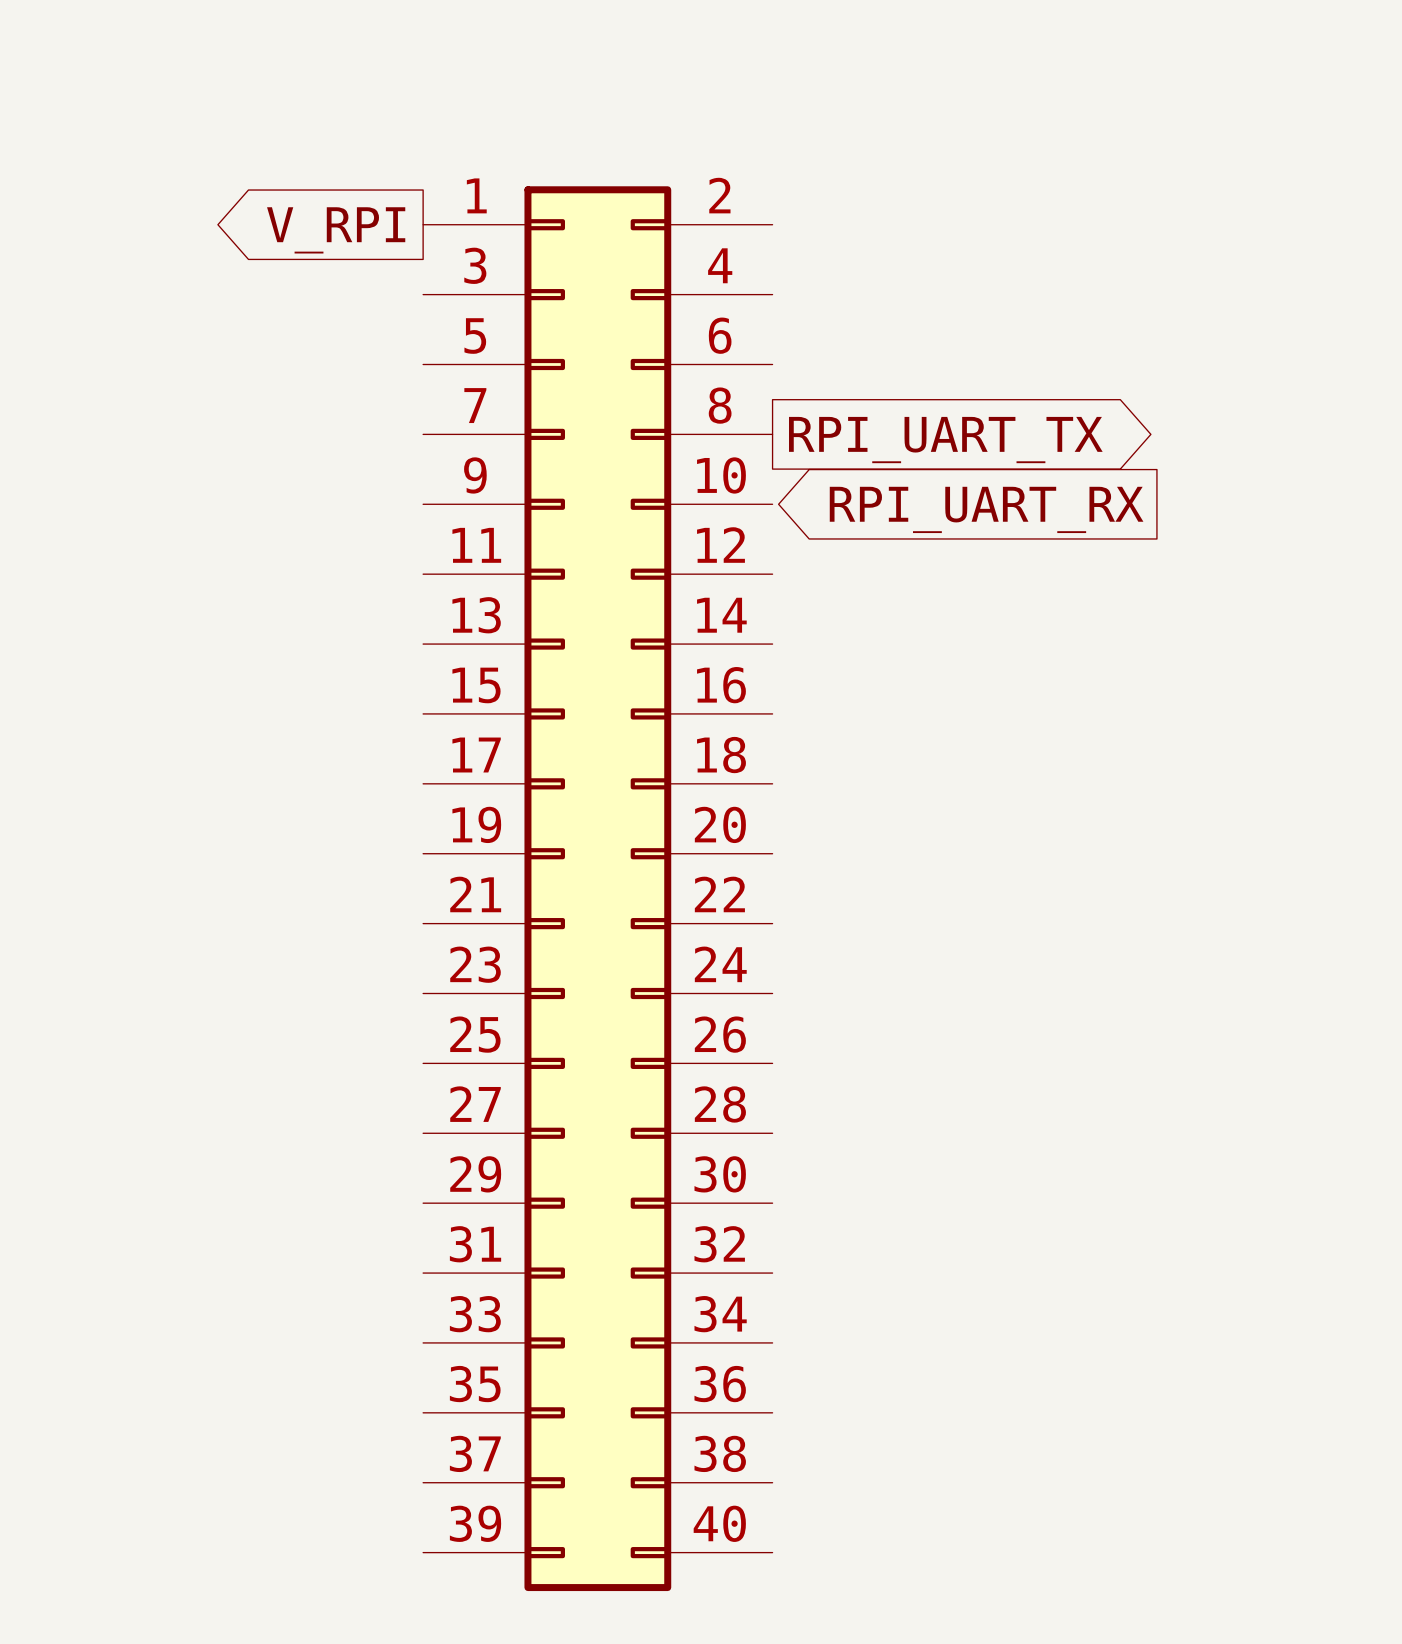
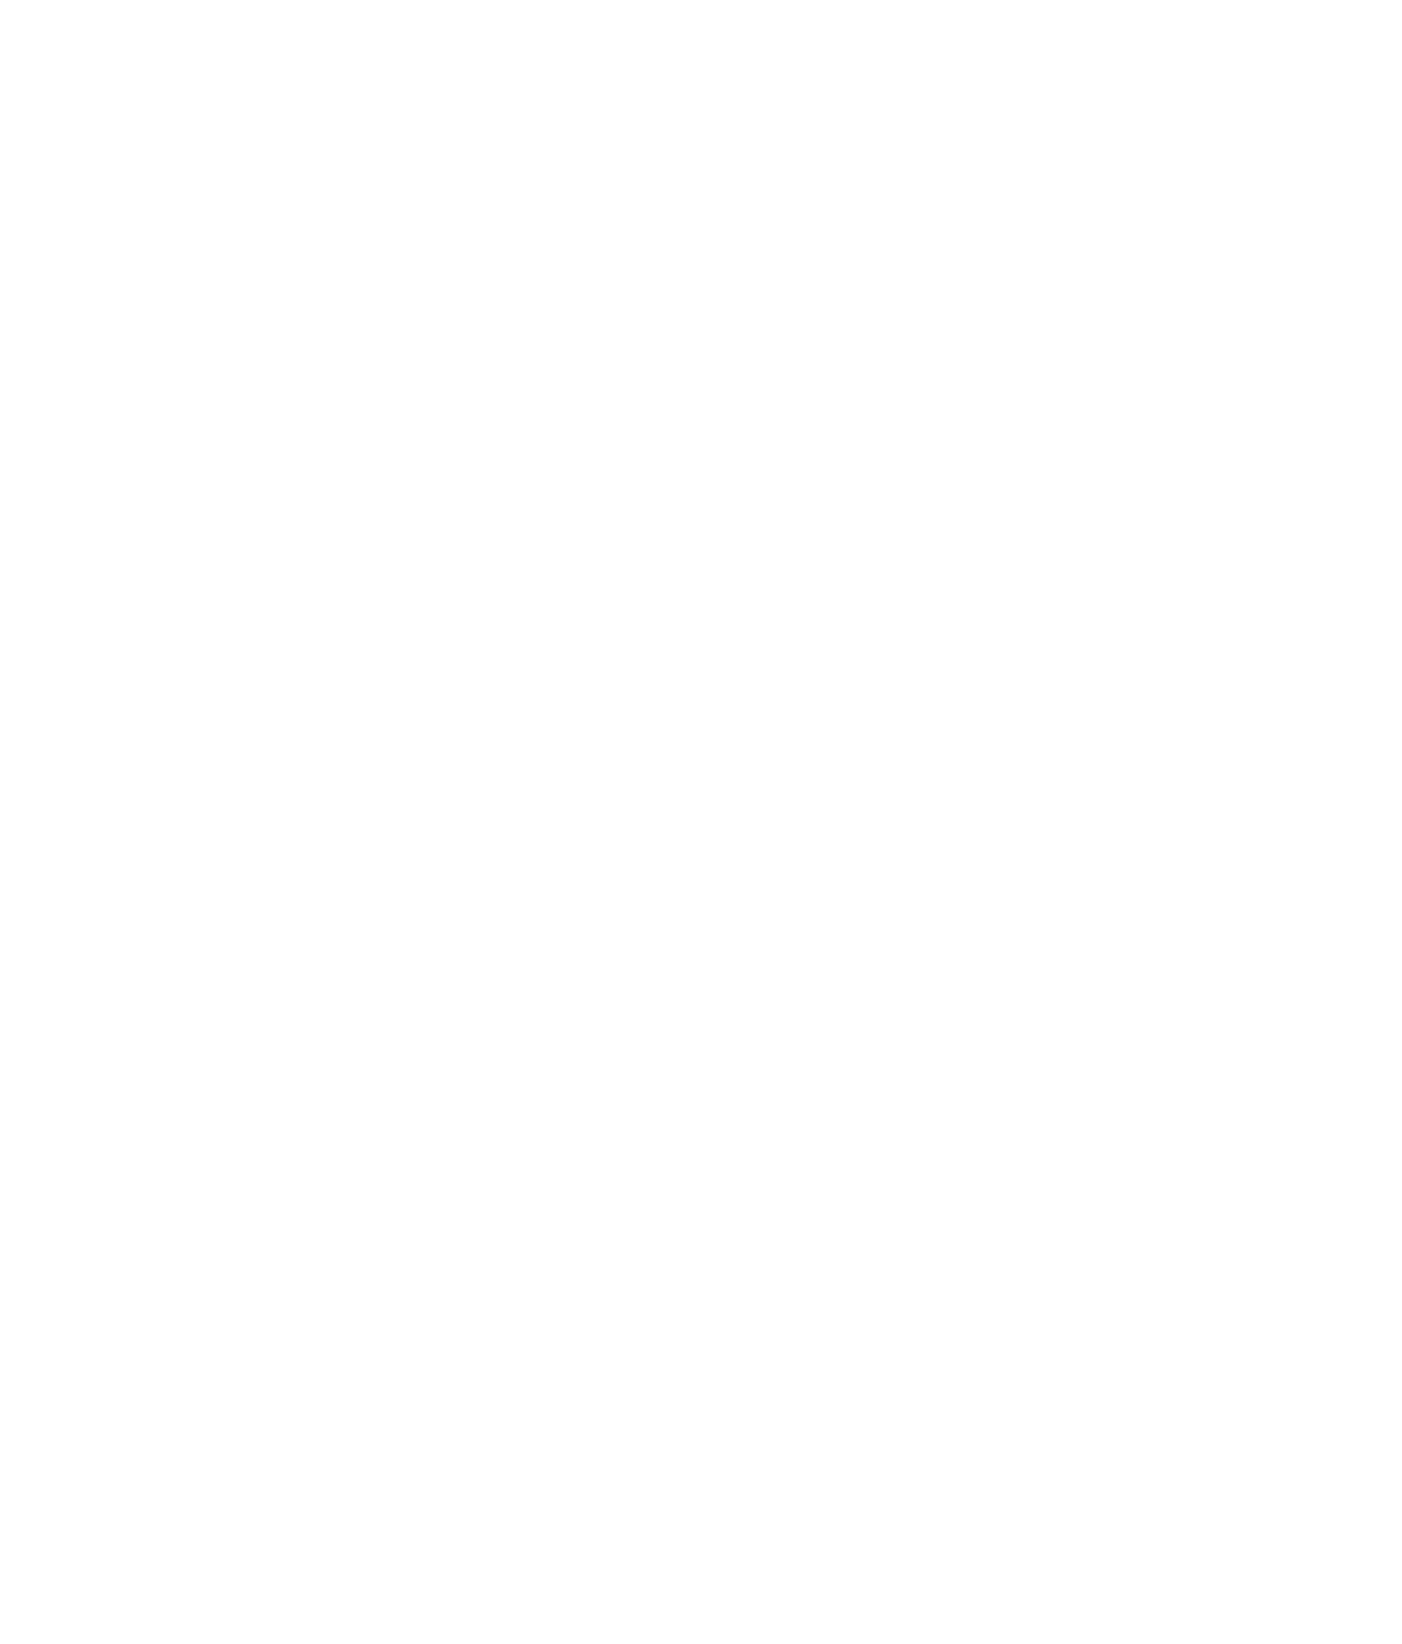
global label: V_RPI (336, 230) -> none
global label: RPI_UART_TX (945, 440) -> none
global label: RPI_UART_RX (986, 509) -> none
part: (597, 888) -> none

